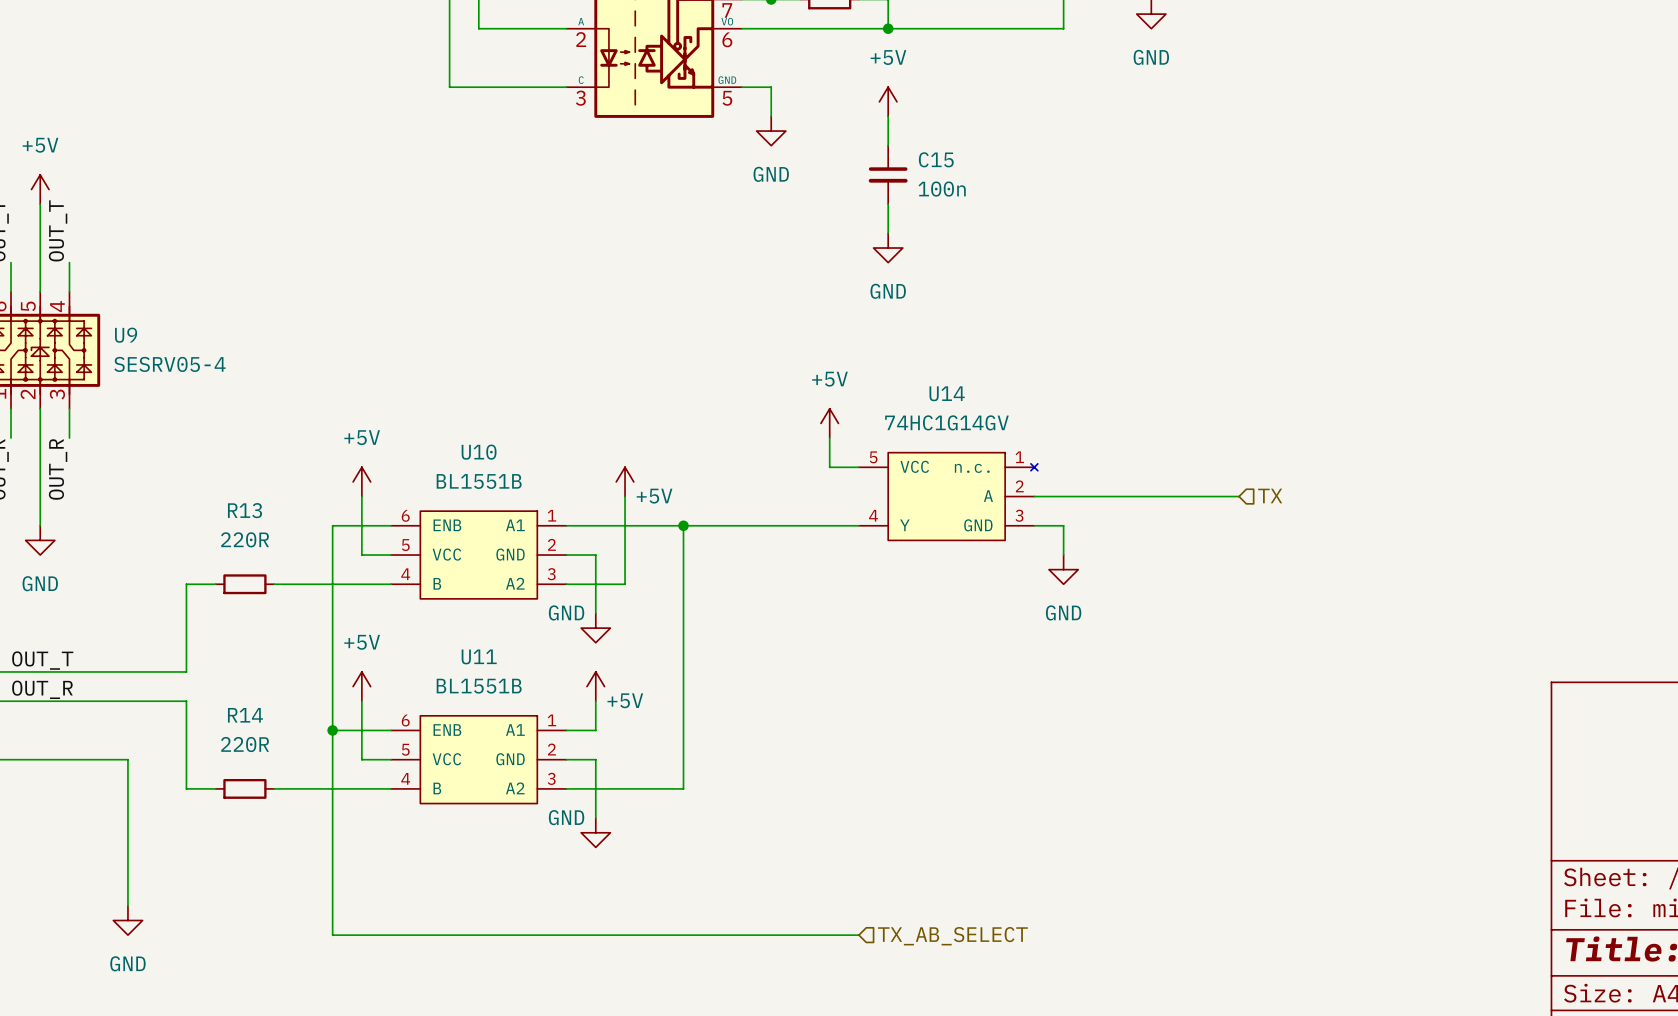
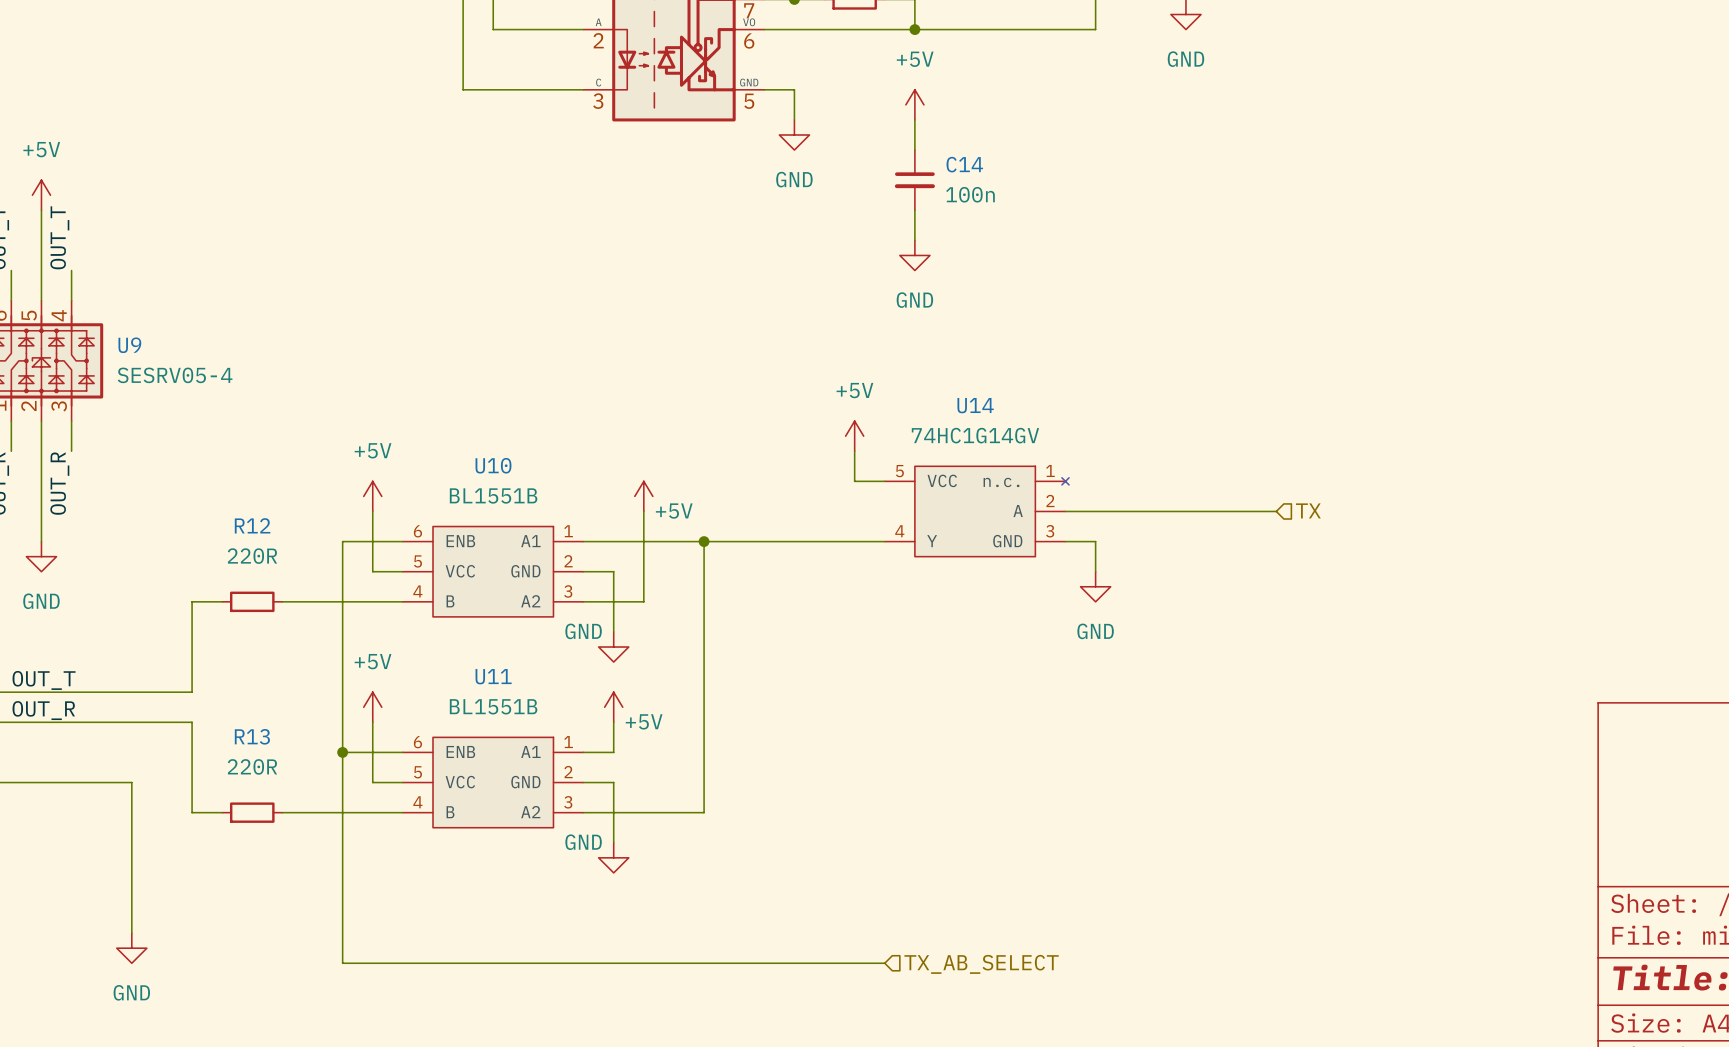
C15 name: C15 (936, 159) -> C14 (964, 164)
R13 name: R13 (245, 510) -> R12 (252, 525)
R14 name: R14 (245, 715) -> R13 (252, 736)

